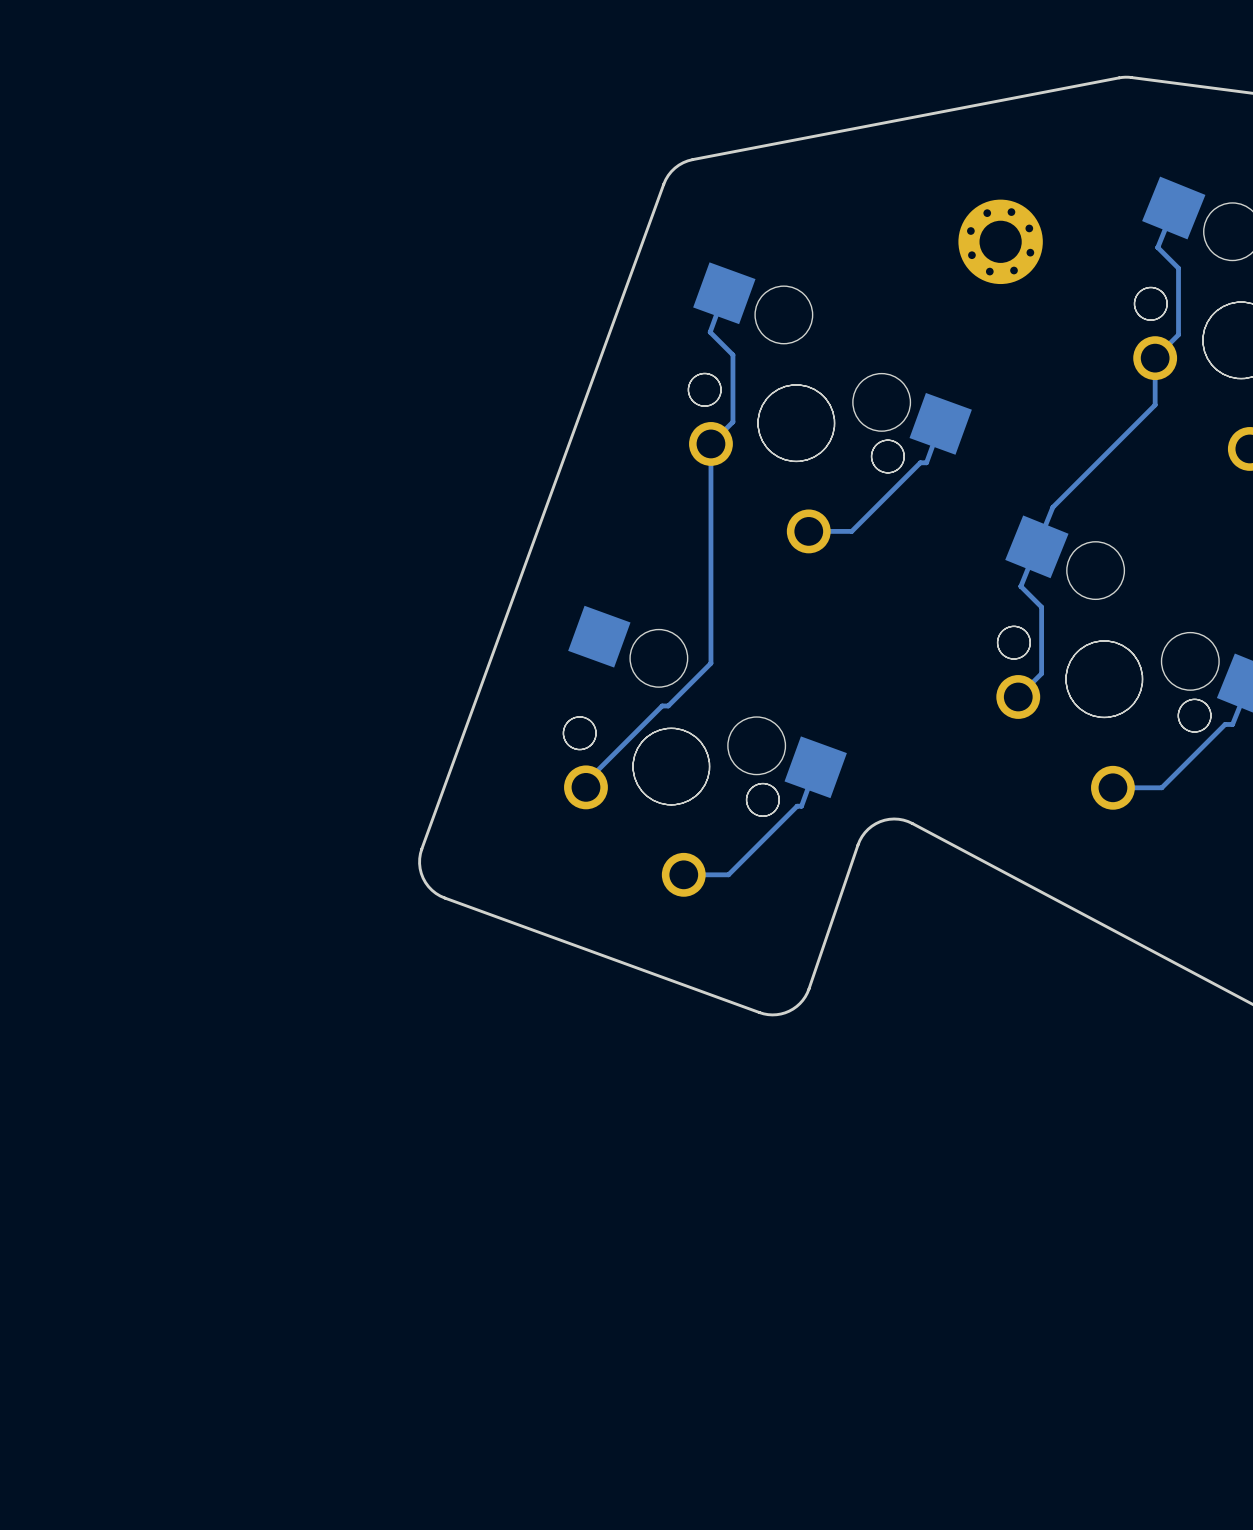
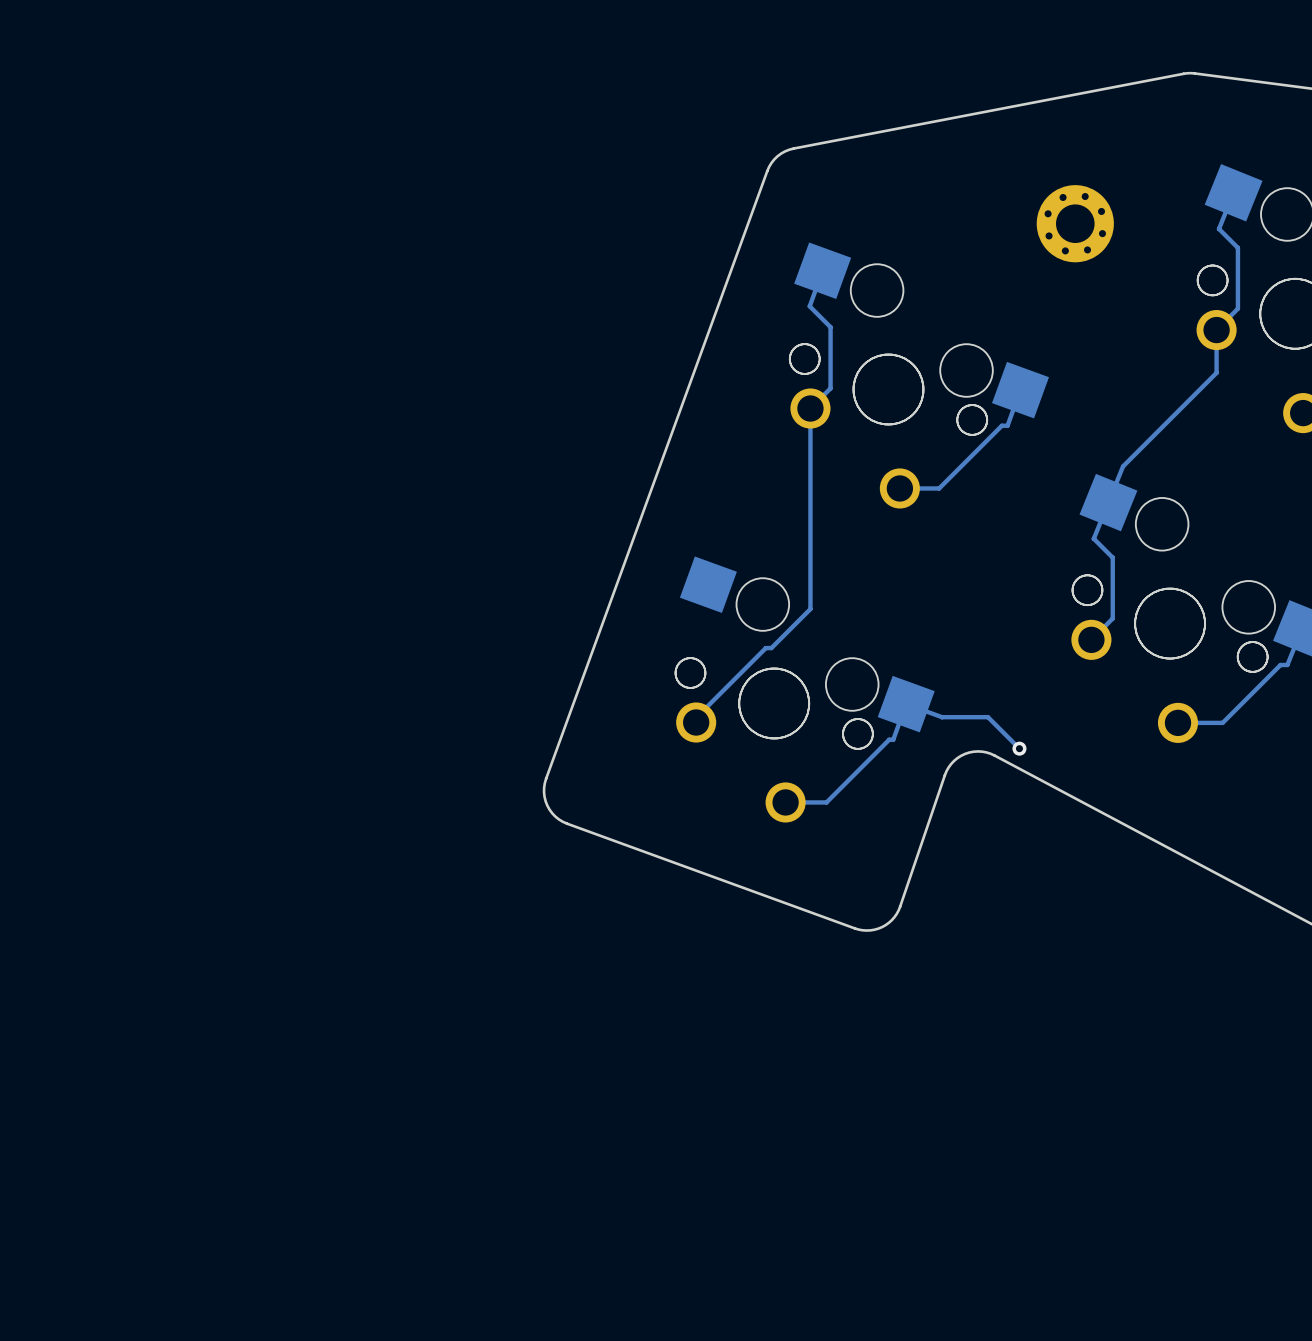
track: none -> (906, 704) (942, 717) (987, 717) (1019, 748)
via: none -> (1019, 748)

